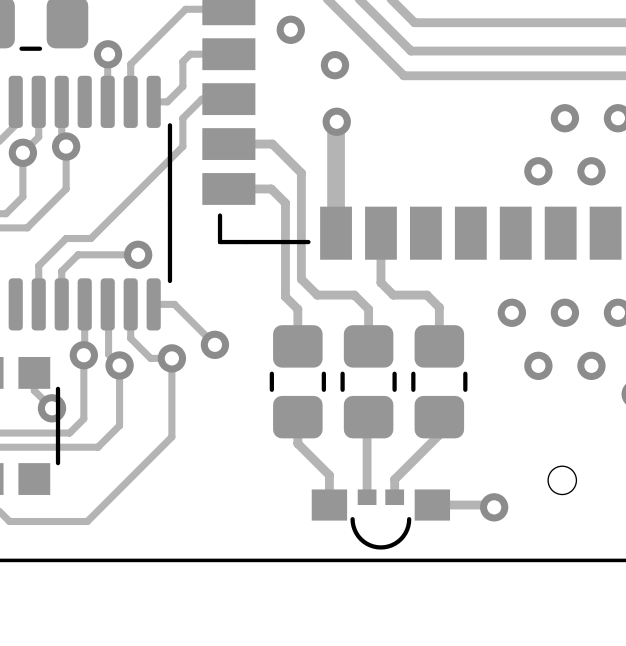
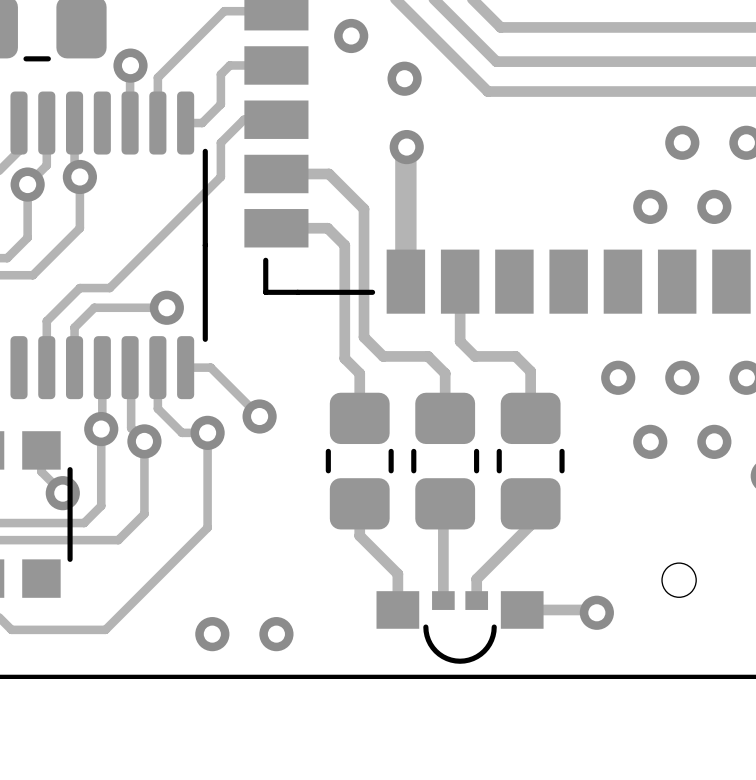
via: none -> (212, 634)
via: none -> (276, 634)

